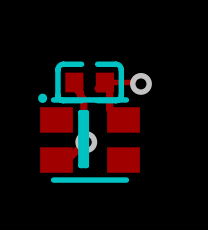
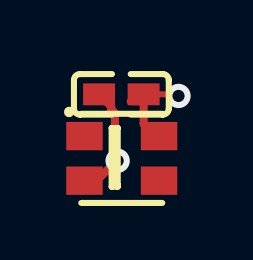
part footprint: [55, 61, 125, 104] -> [70, 71, 172, 118]

